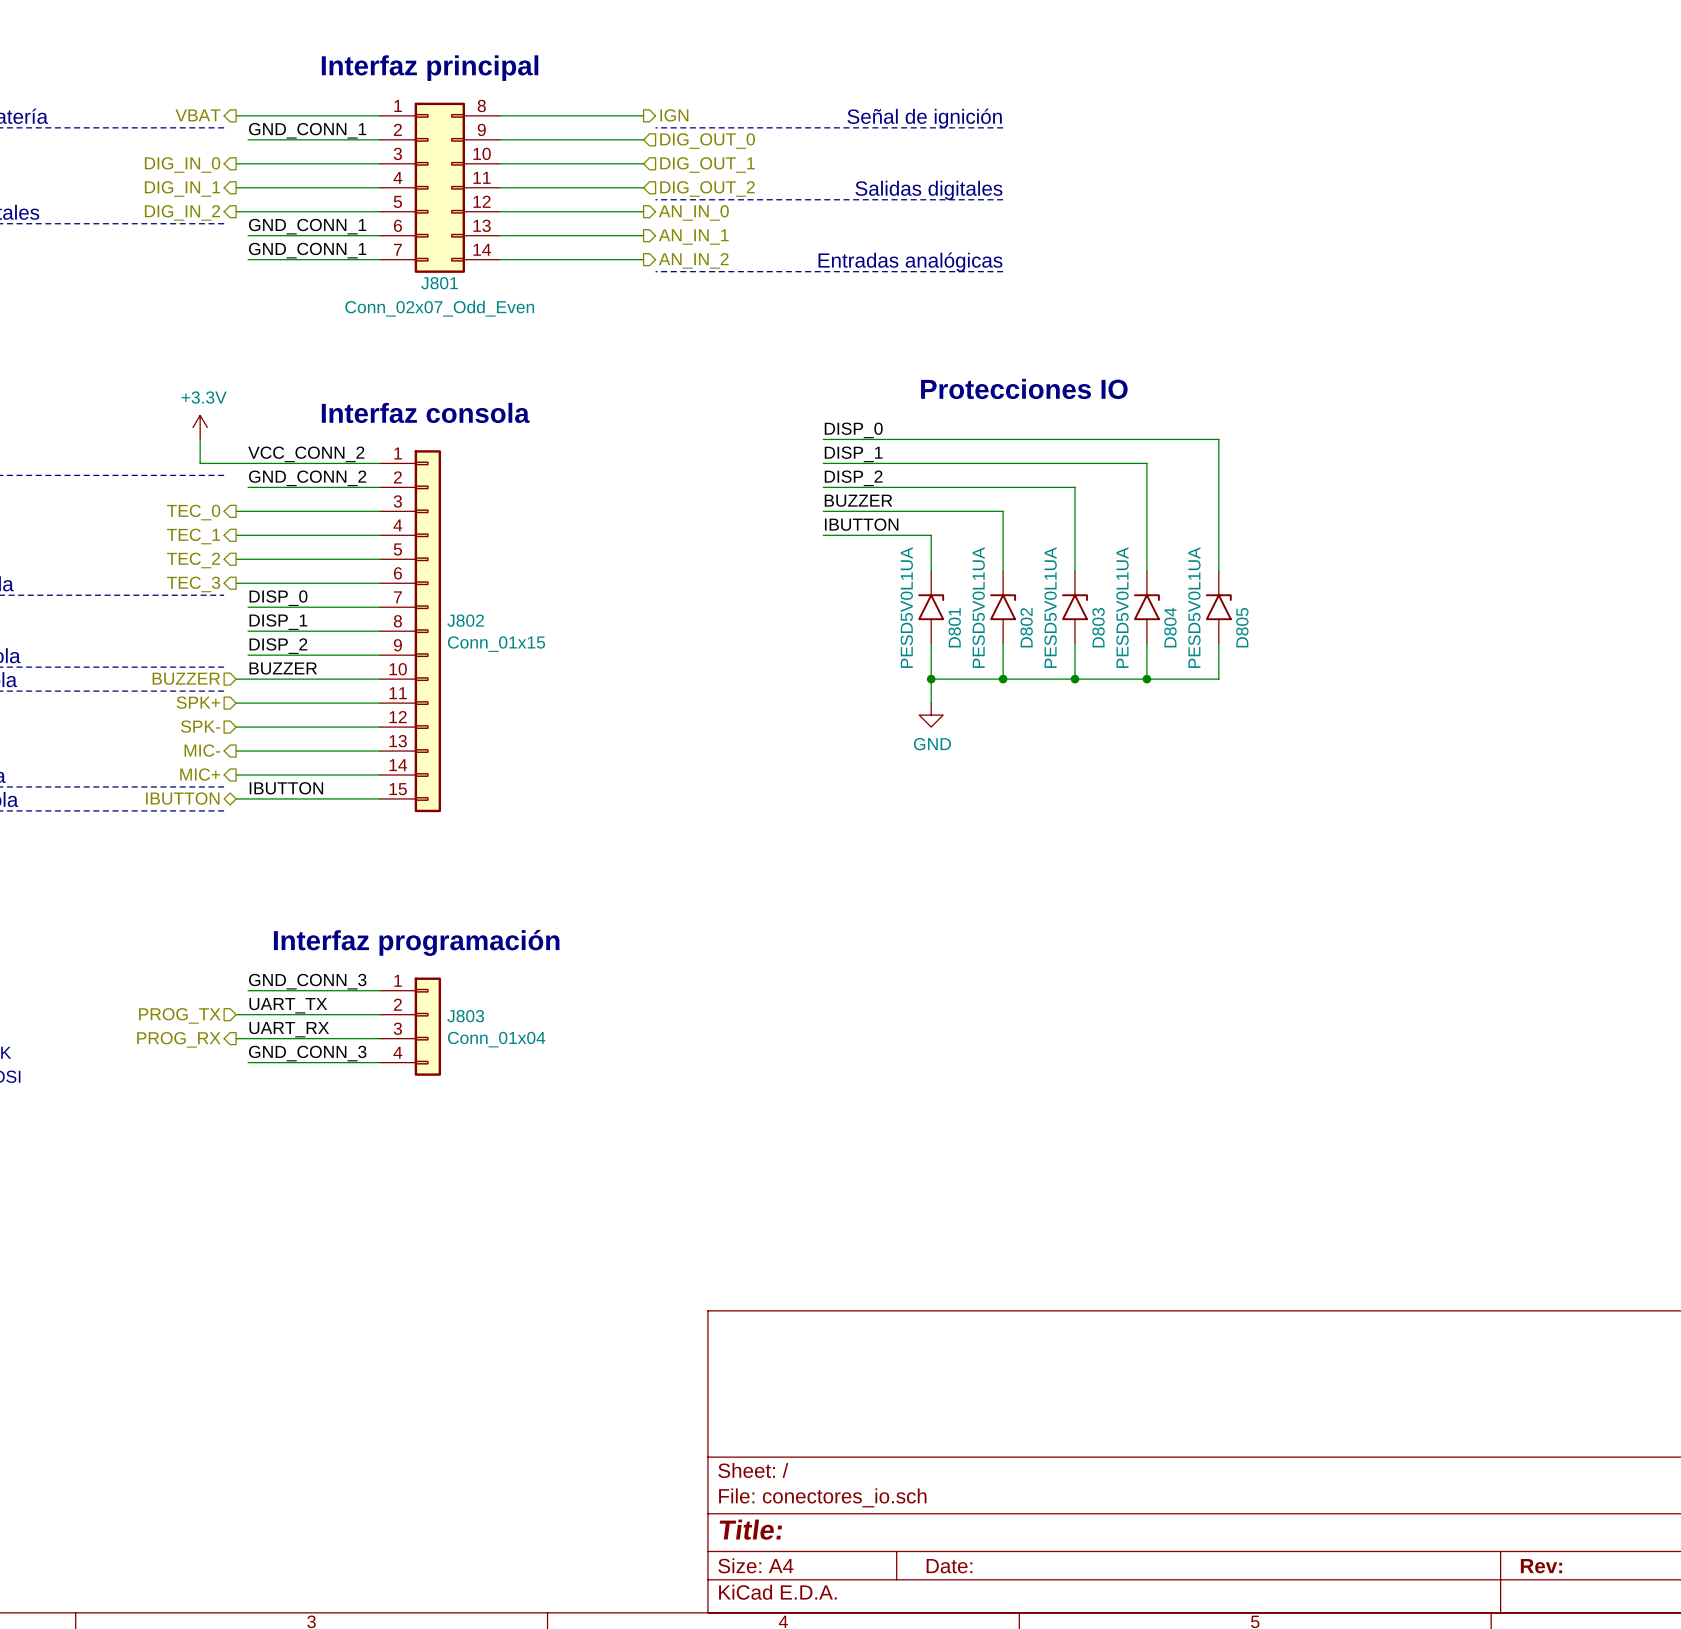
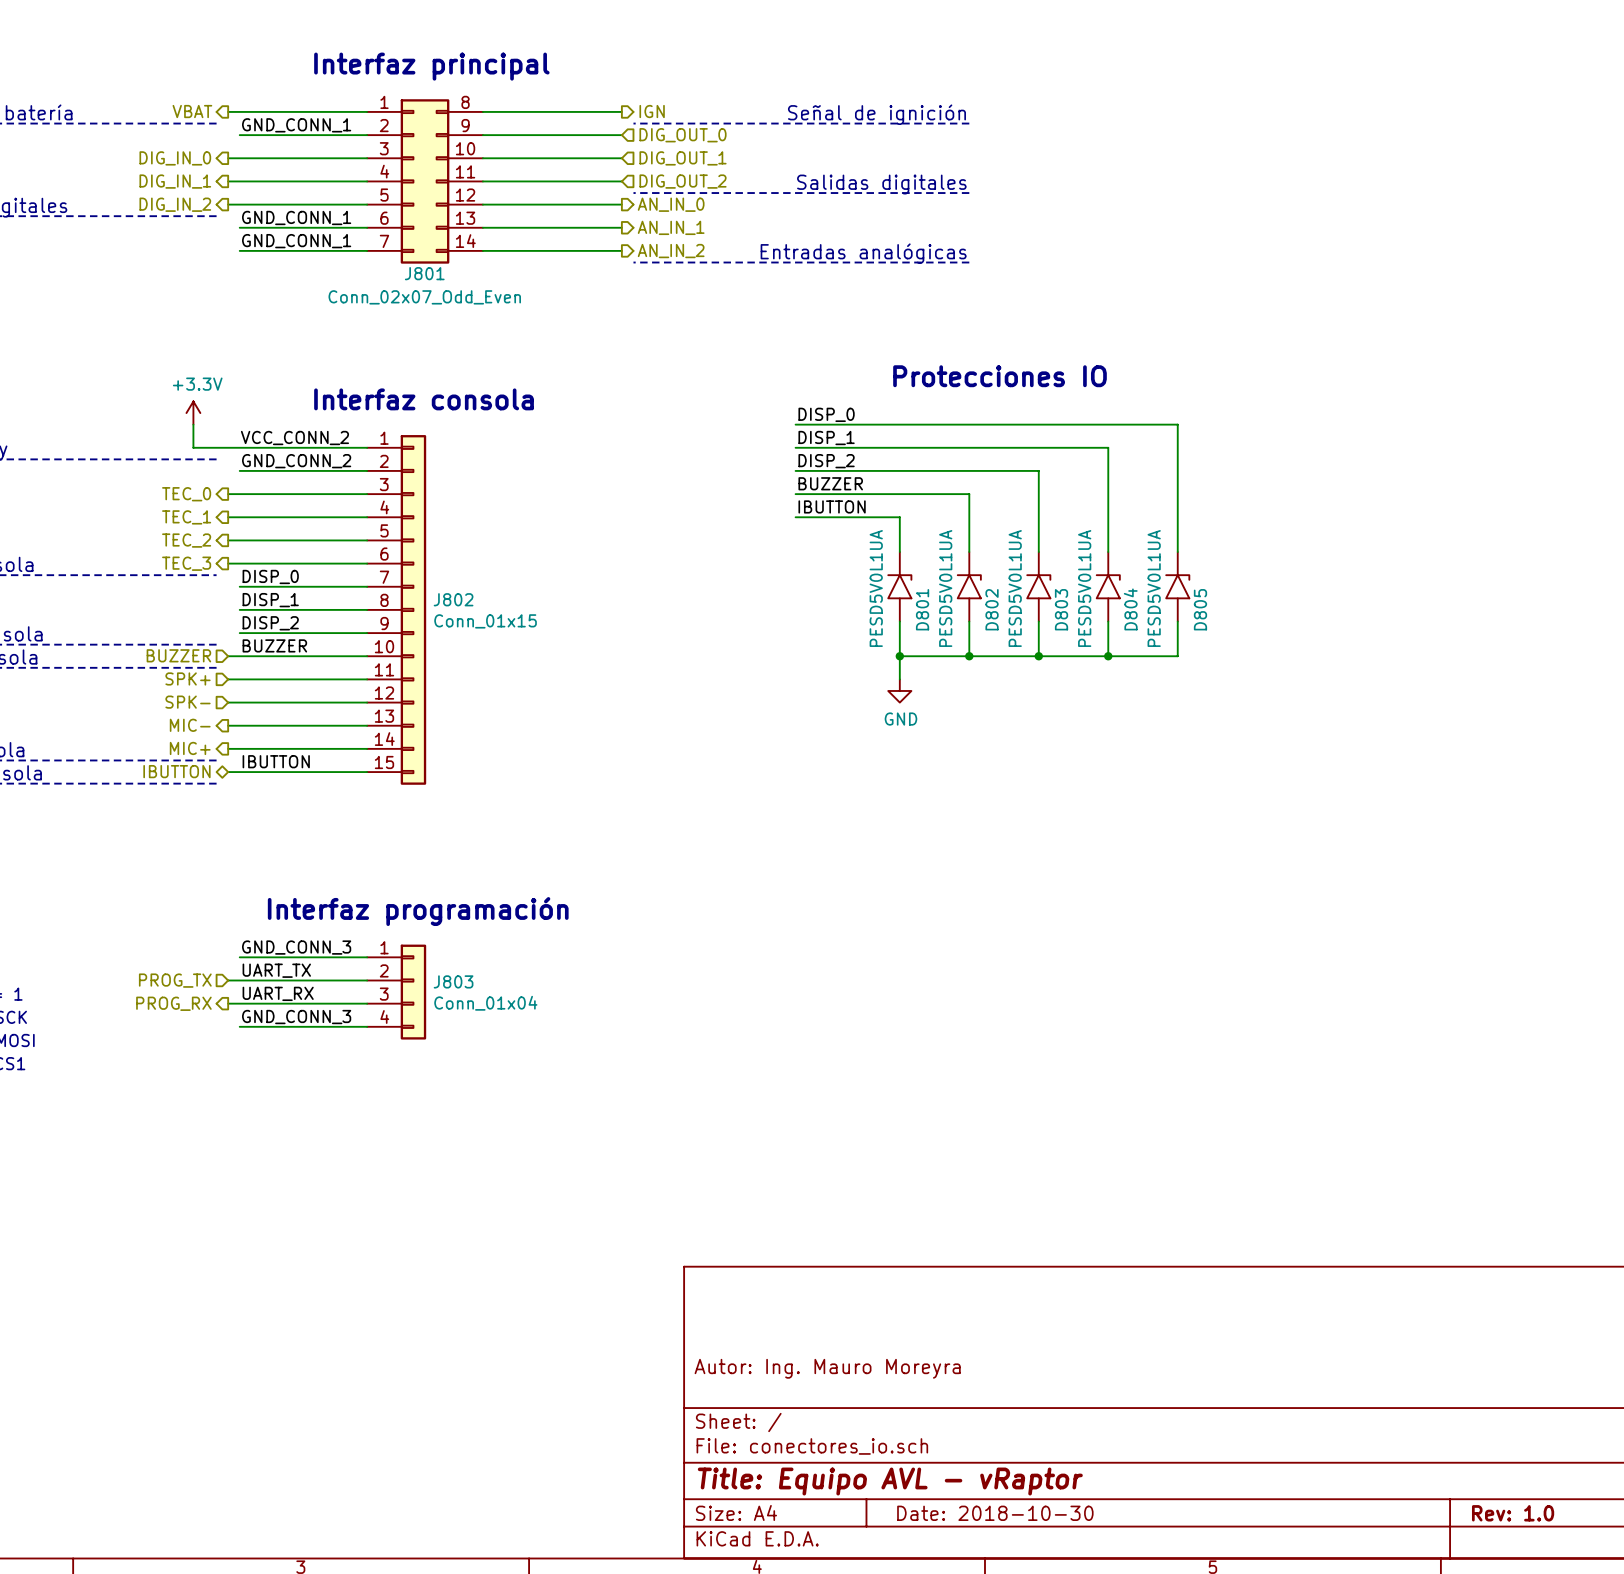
title block: none -> Autor: Ing. Mauro Moreyra (827, 1368)
title block: Title: (750, 1529) -> Title: Equipo AVL - vRaptor (890, 1481)
title block: Date: (949, 1566) -> Date: 2018-10-30 (995, 1513)
title block: Rev: (1541, 1566) -> Rev: 1.0 (1513, 1513)

